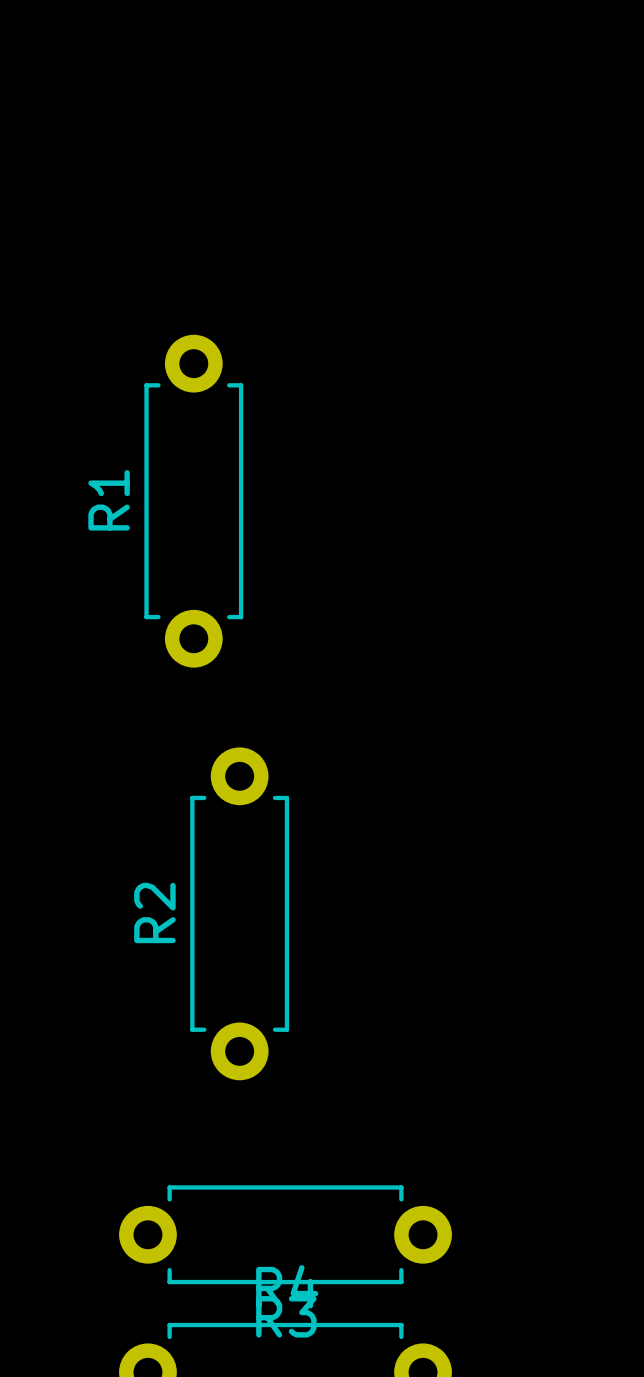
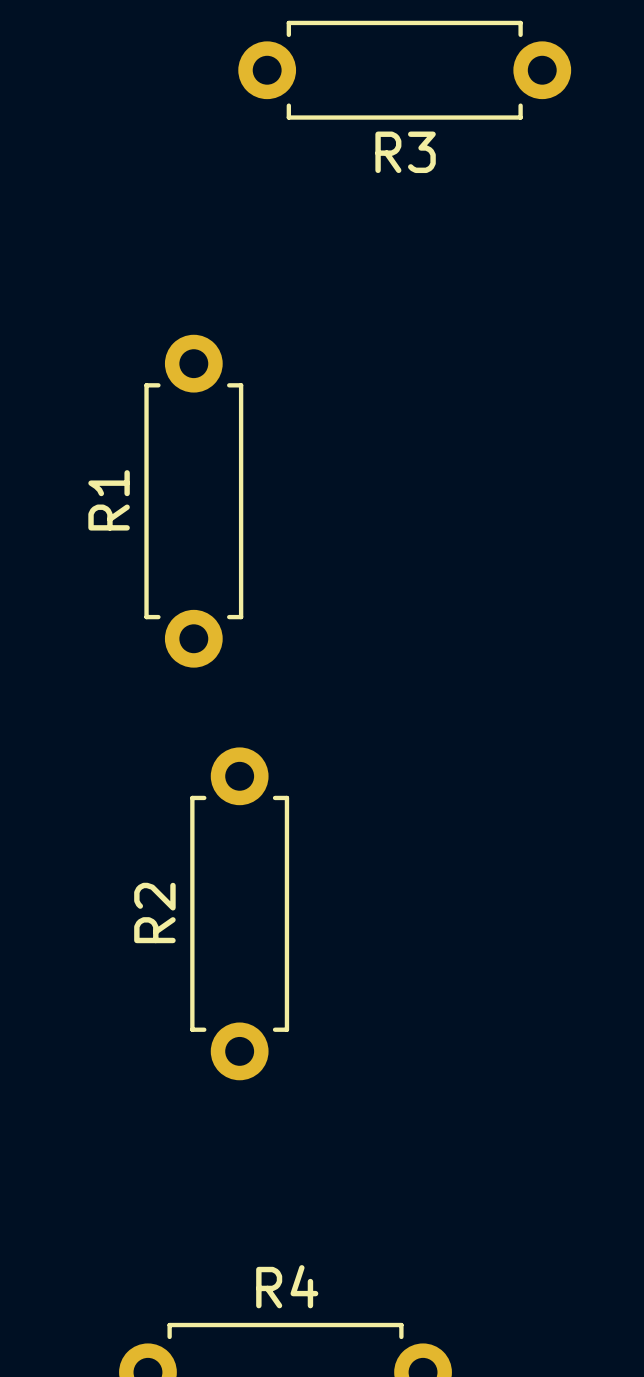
R3 position: (285, 1234) -> (404, 70)

